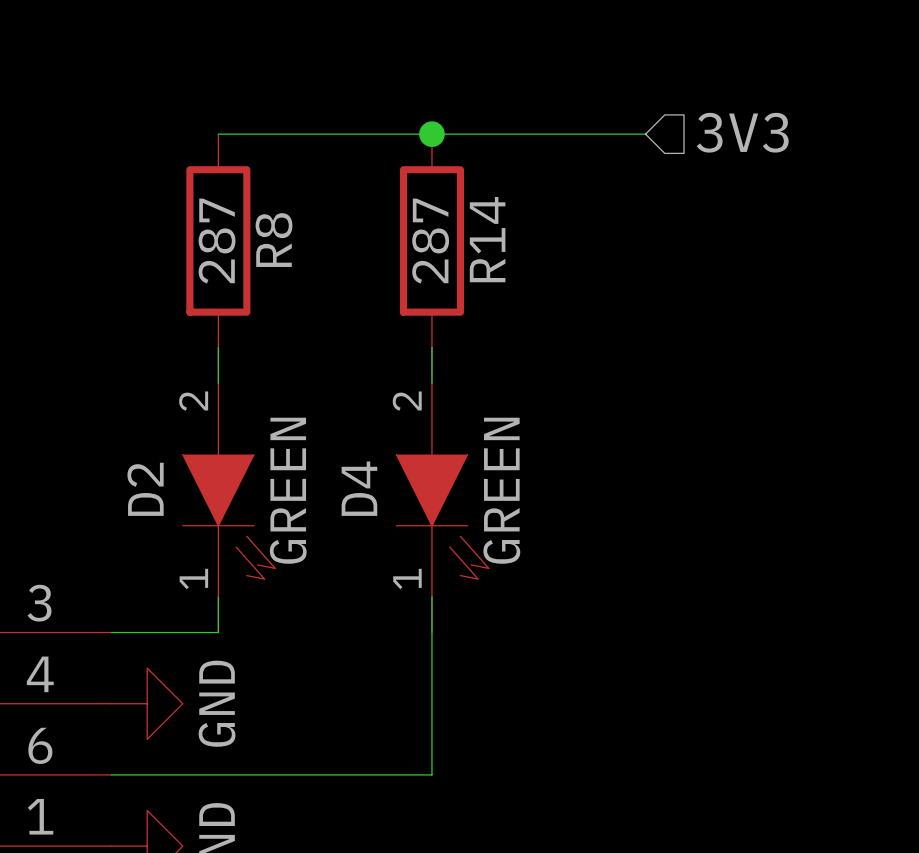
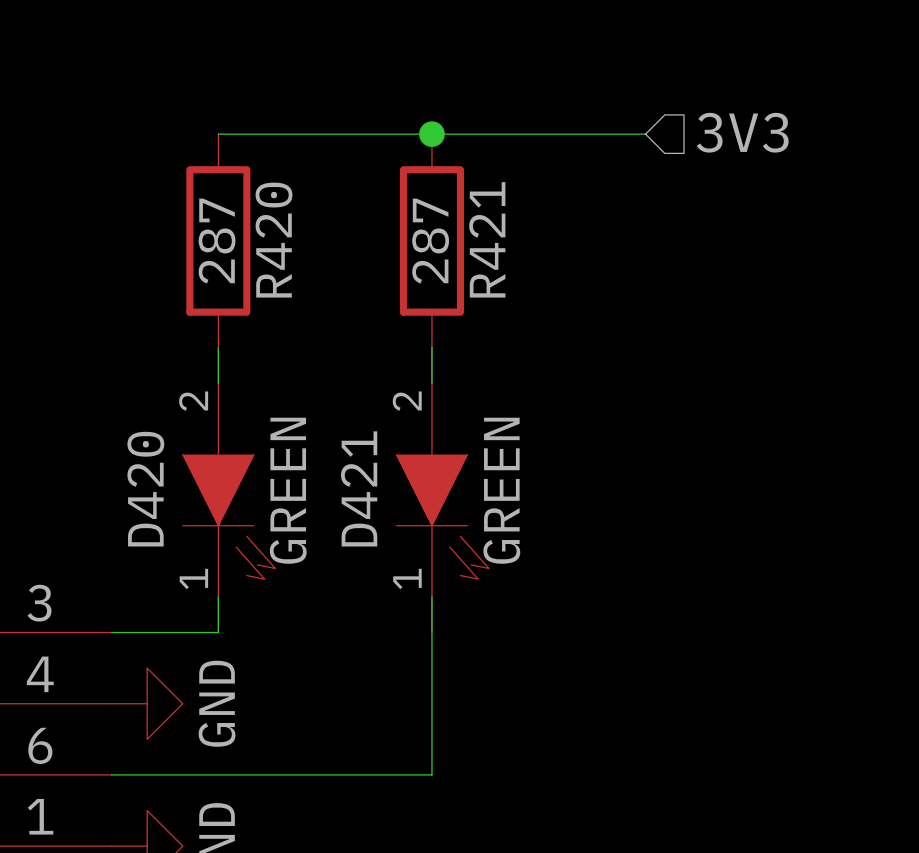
R14 name: R14 (487, 239) -> R421 (487, 239)
R8 name: R8 (274, 240) -> R420 (274, 240)
D4 name: D4 (359, 488) -> D421 (359, 488)
D2 name: D2 (145, 489) -> D420 (145, 489)

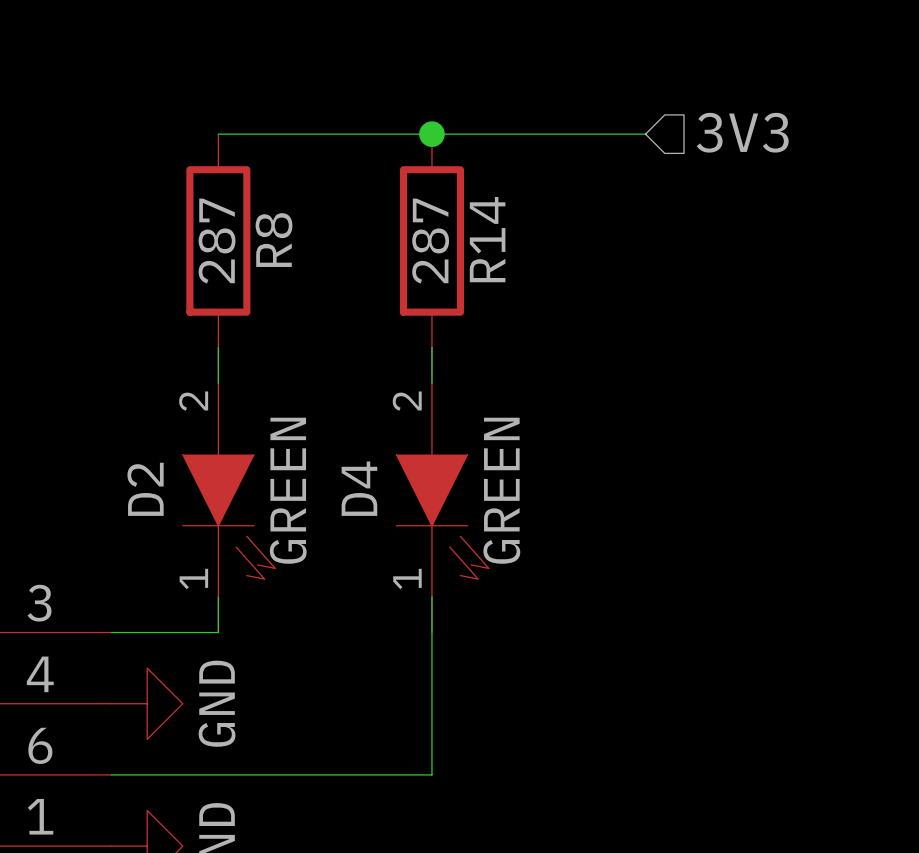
R421 name: R421 (487, 239) -> R14 (487, 239)
R420 name: R420 (274, 240) -> R8 (274, 240)
D421 name: D421 (359, 488) -> D4 (359, 488)
D420 name: D420 (145, 489) -> D2 (145, 489)

